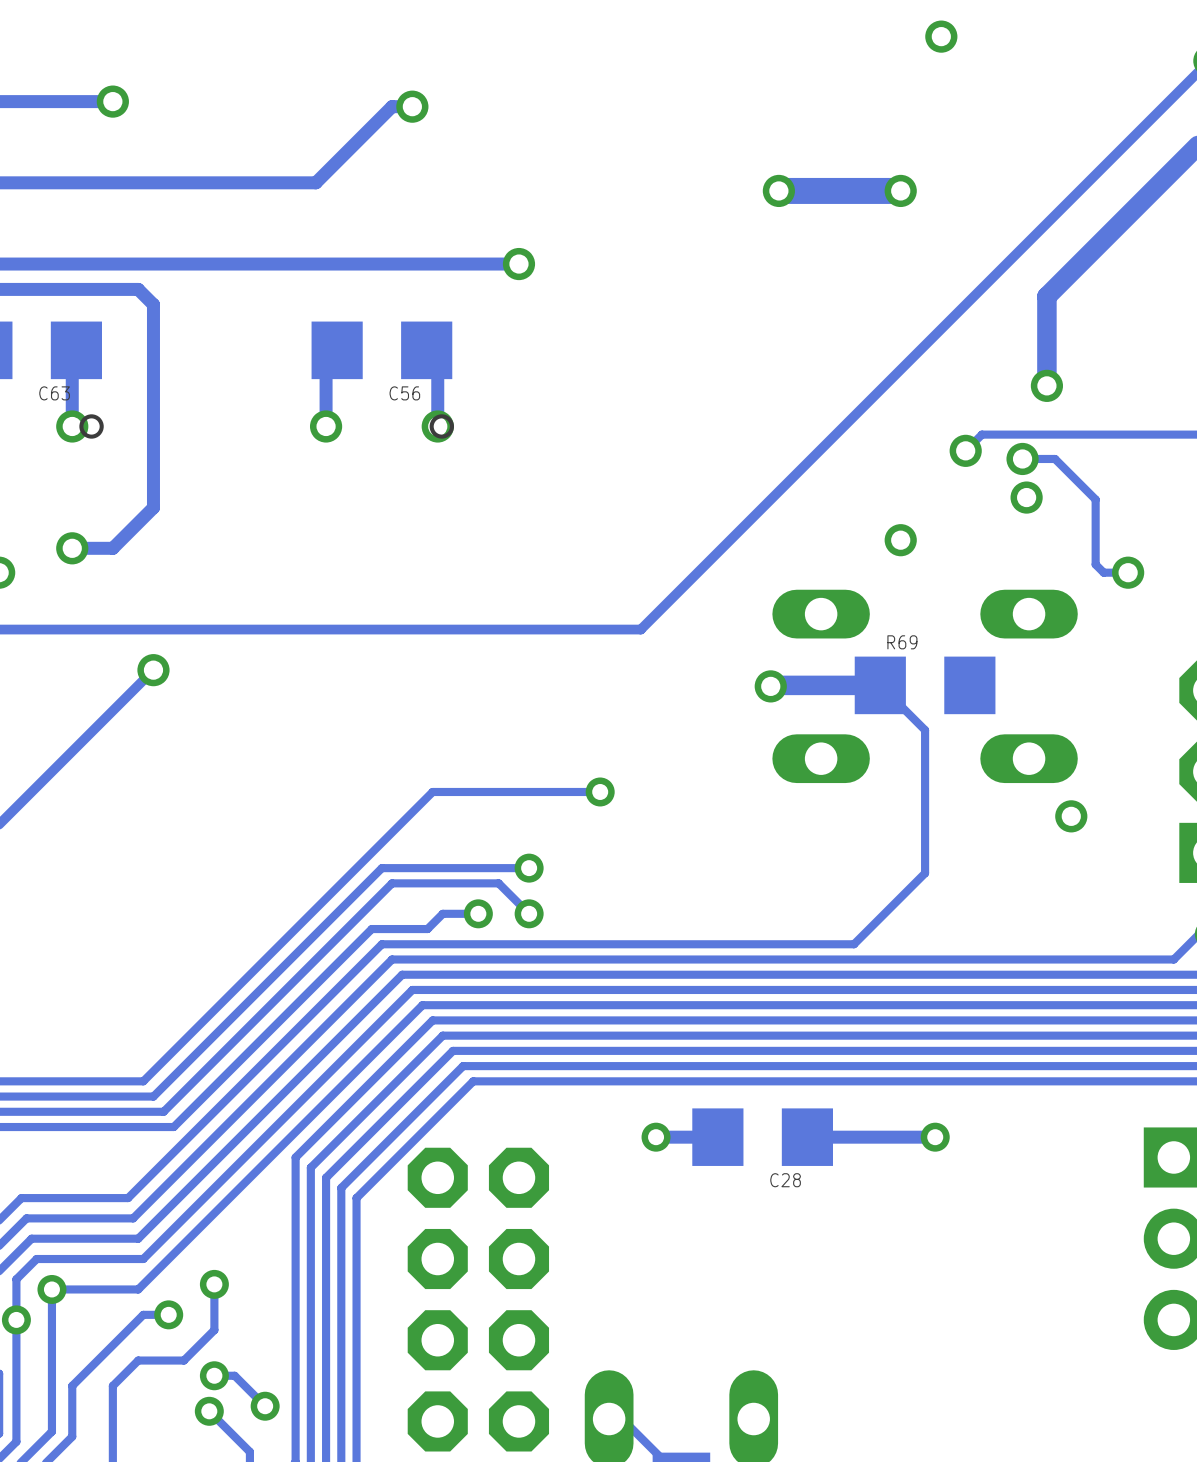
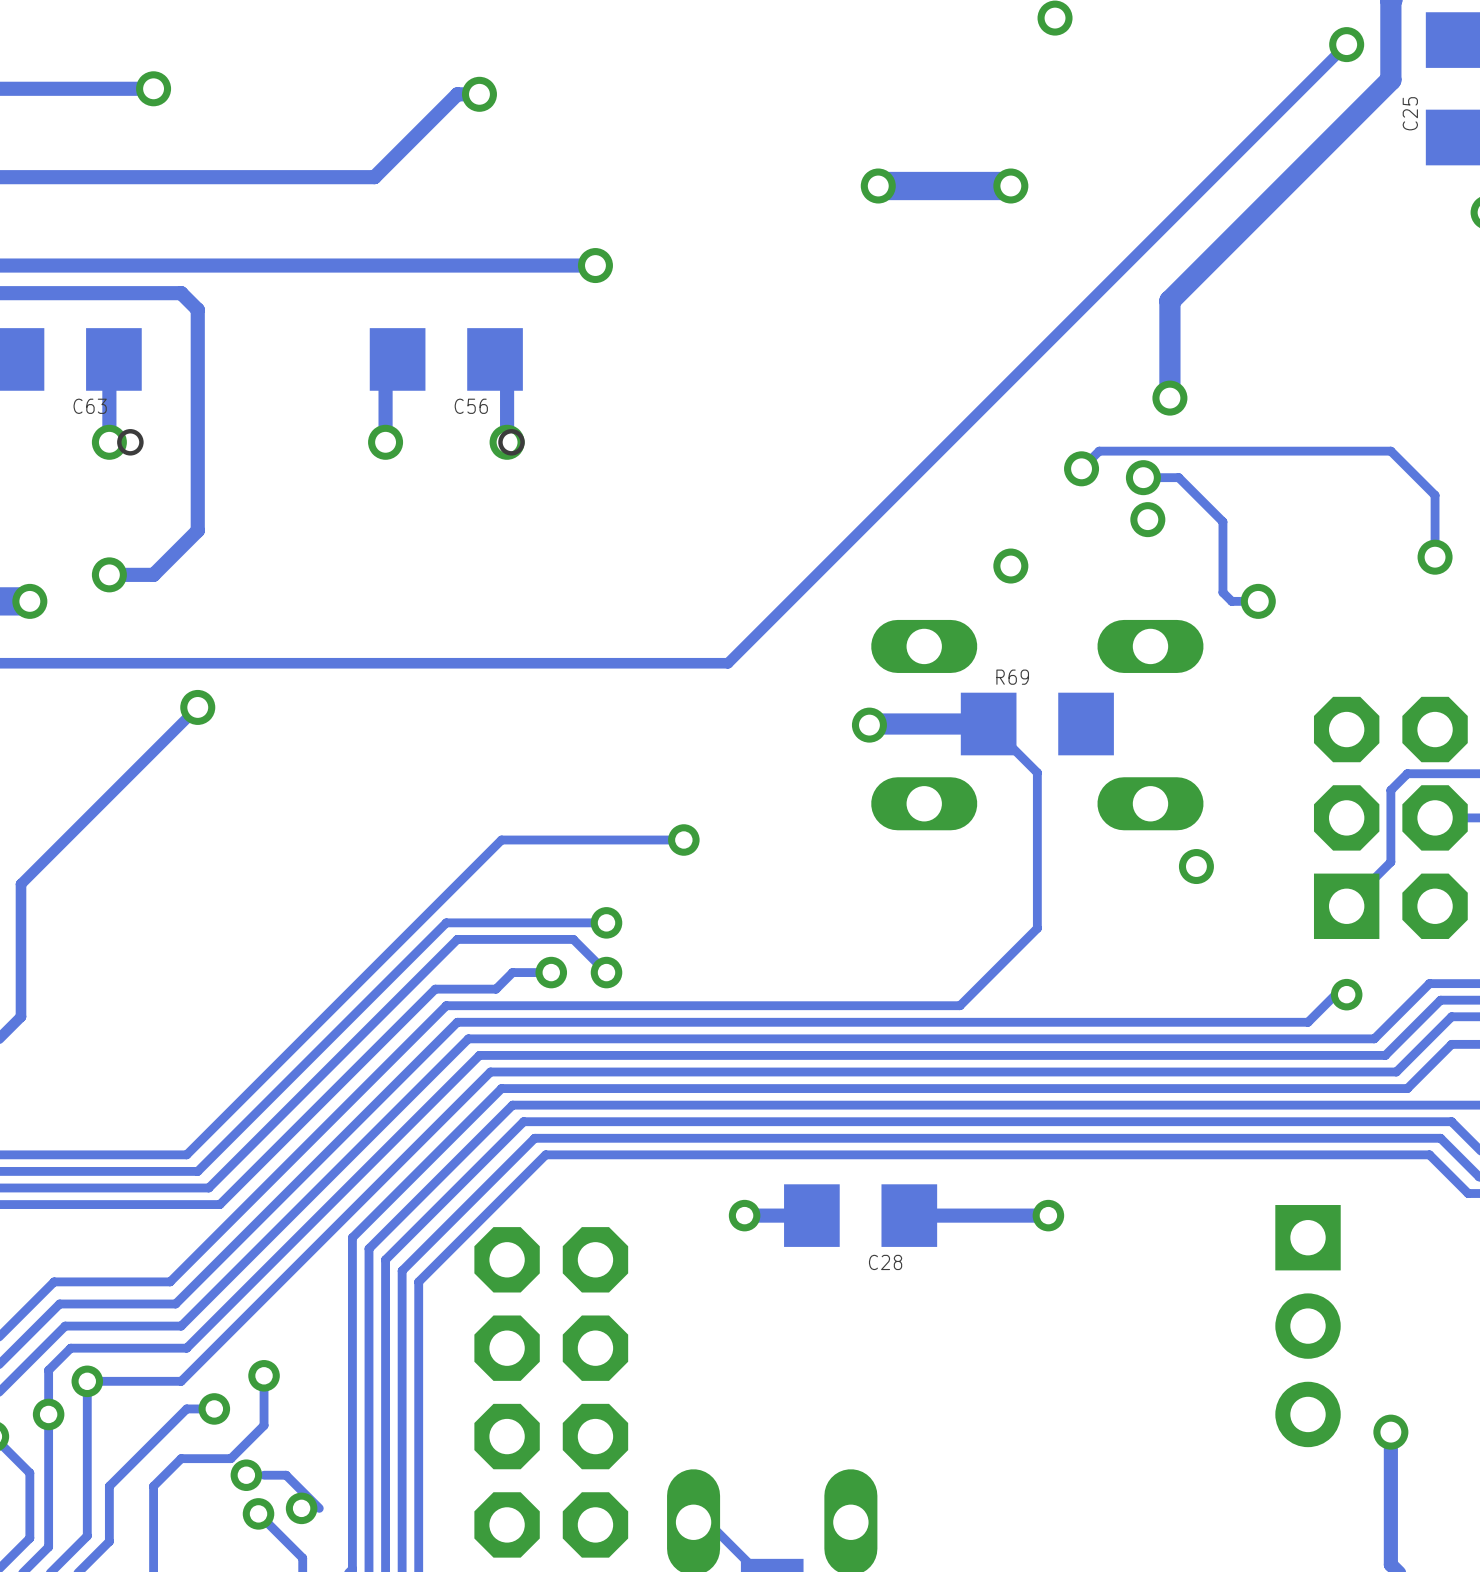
via position: (214, 1375) -> (246, 1475)
via position: (265, 1406) -> (301, 1508)

